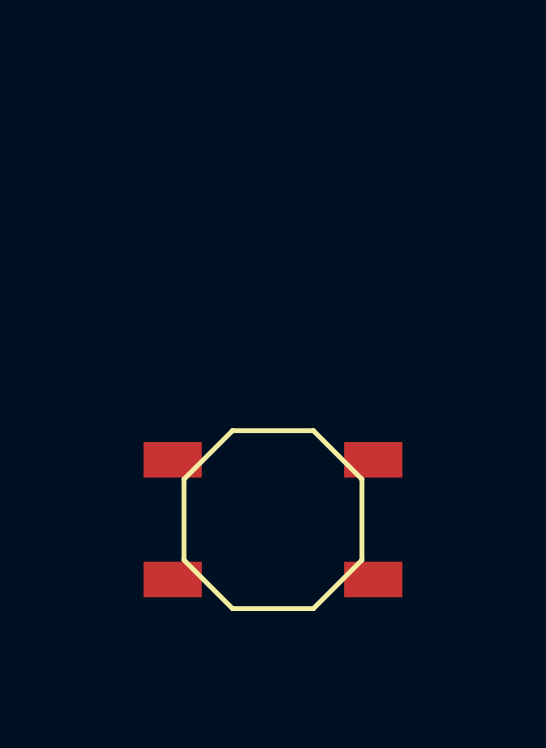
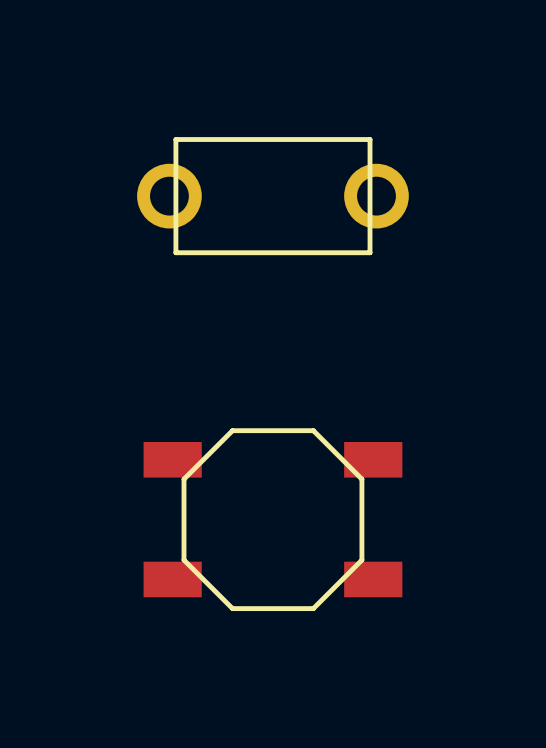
part: none -> (272, 196)

